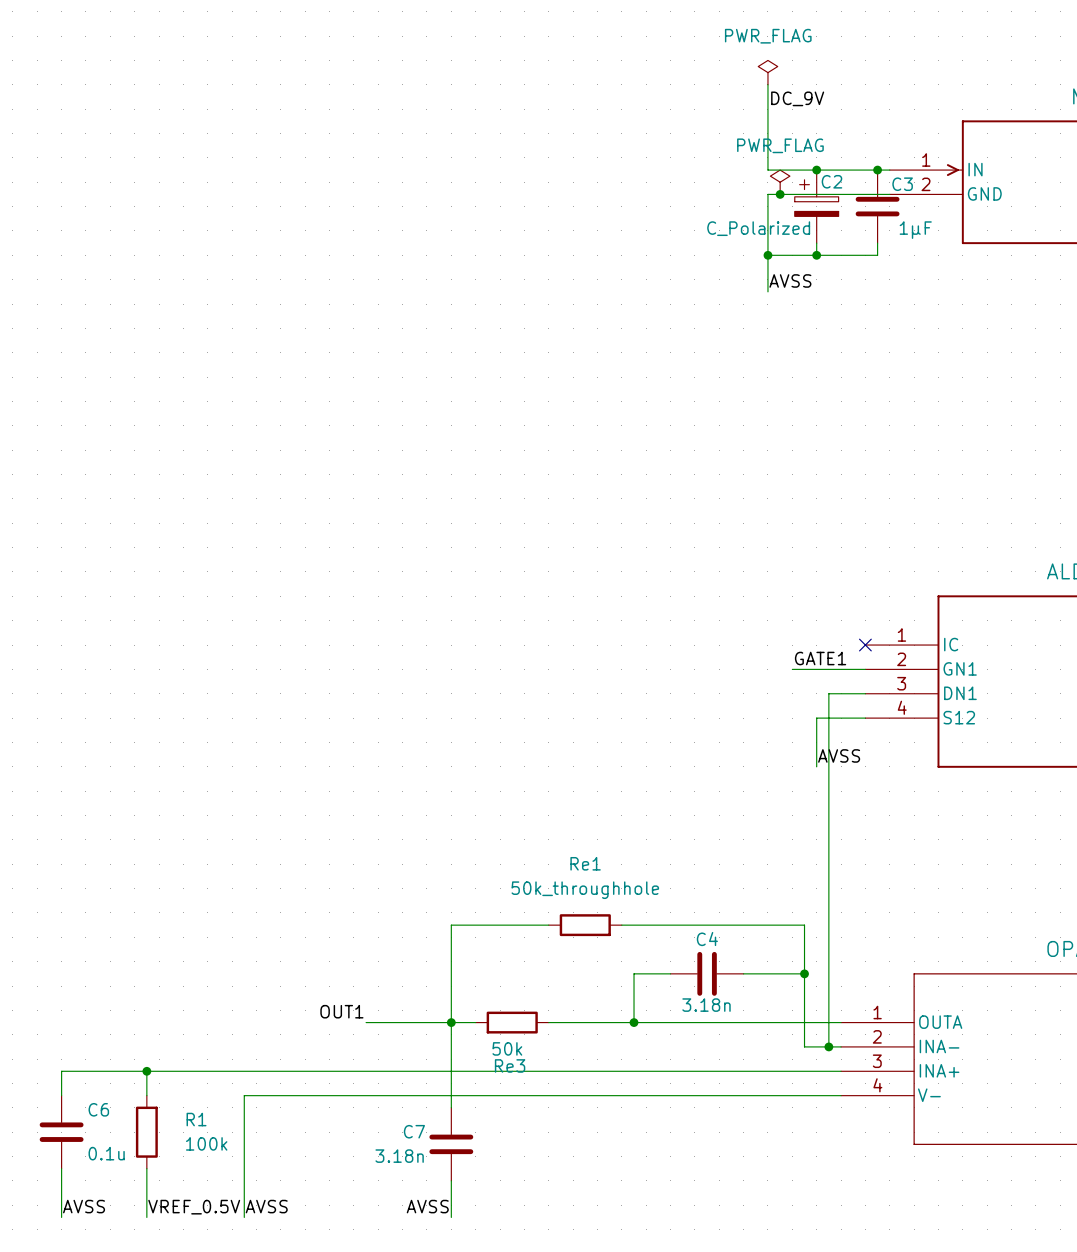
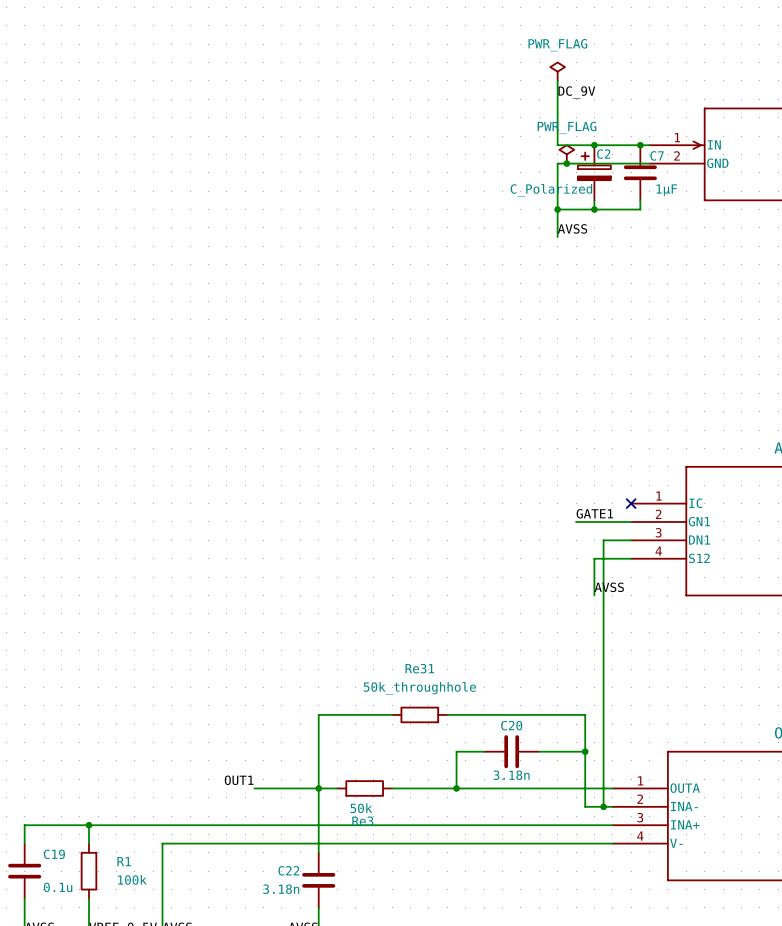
C3 name: C3 (902, 184) -> C7 (657, 155)
Re1 name: Re1 (585, 863) -> Re31 (419, 668)
C4 name: C4 (707, 939) -> C20 (511, 725)
C6 name: C6 (98, 1109) -> C19 (54, 854)
C7 name: C7 (414, 1131) -> C22 (288, 870)

